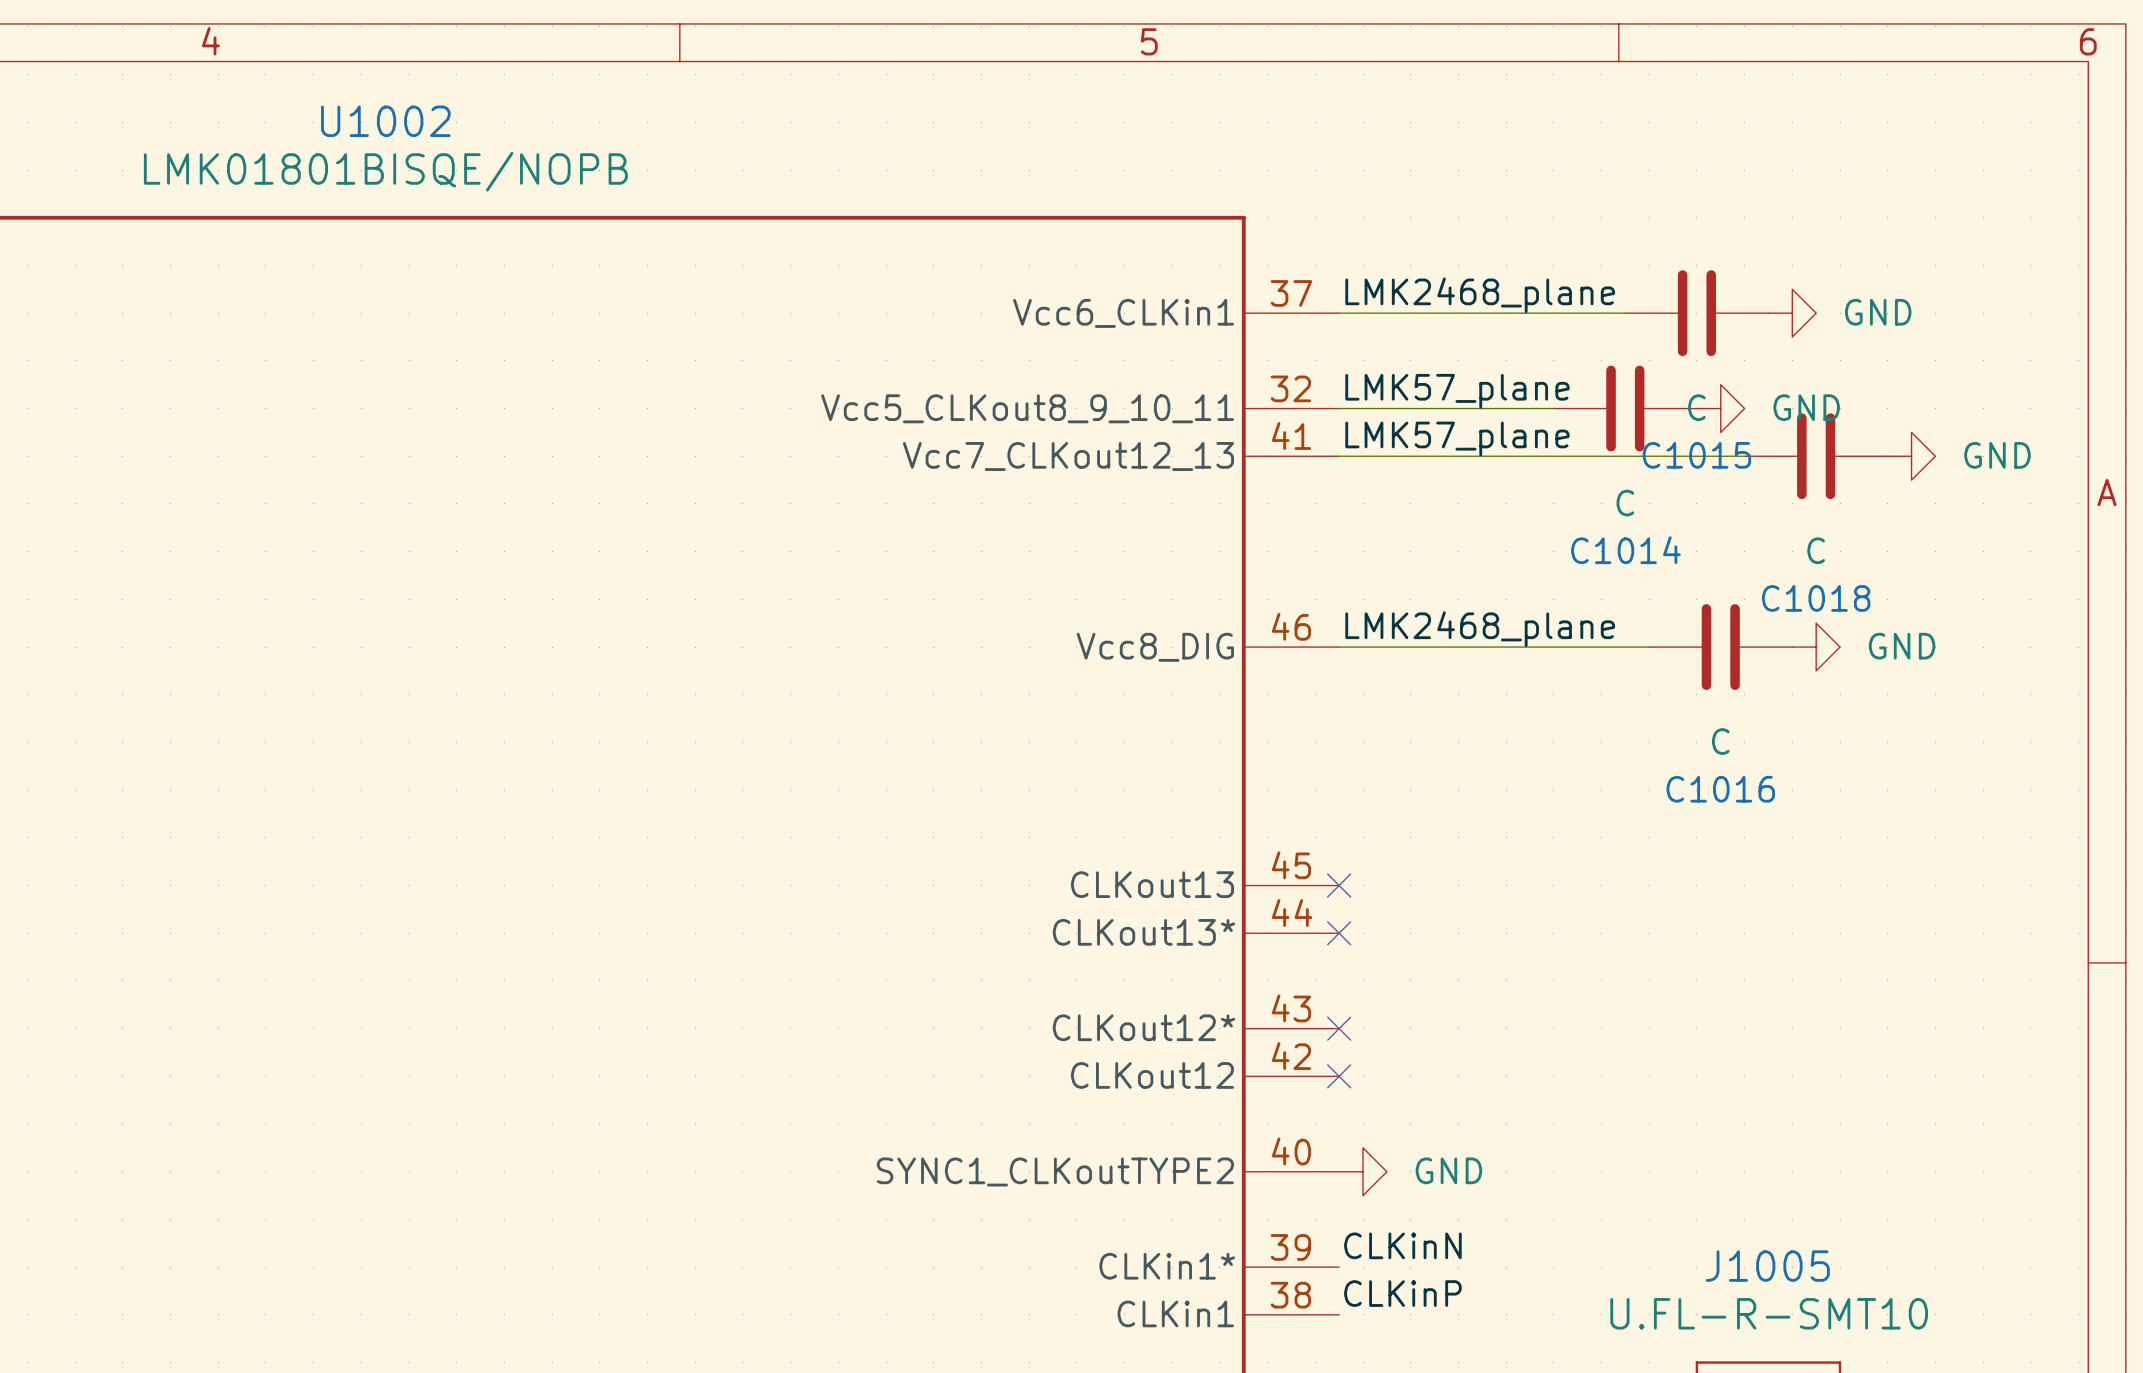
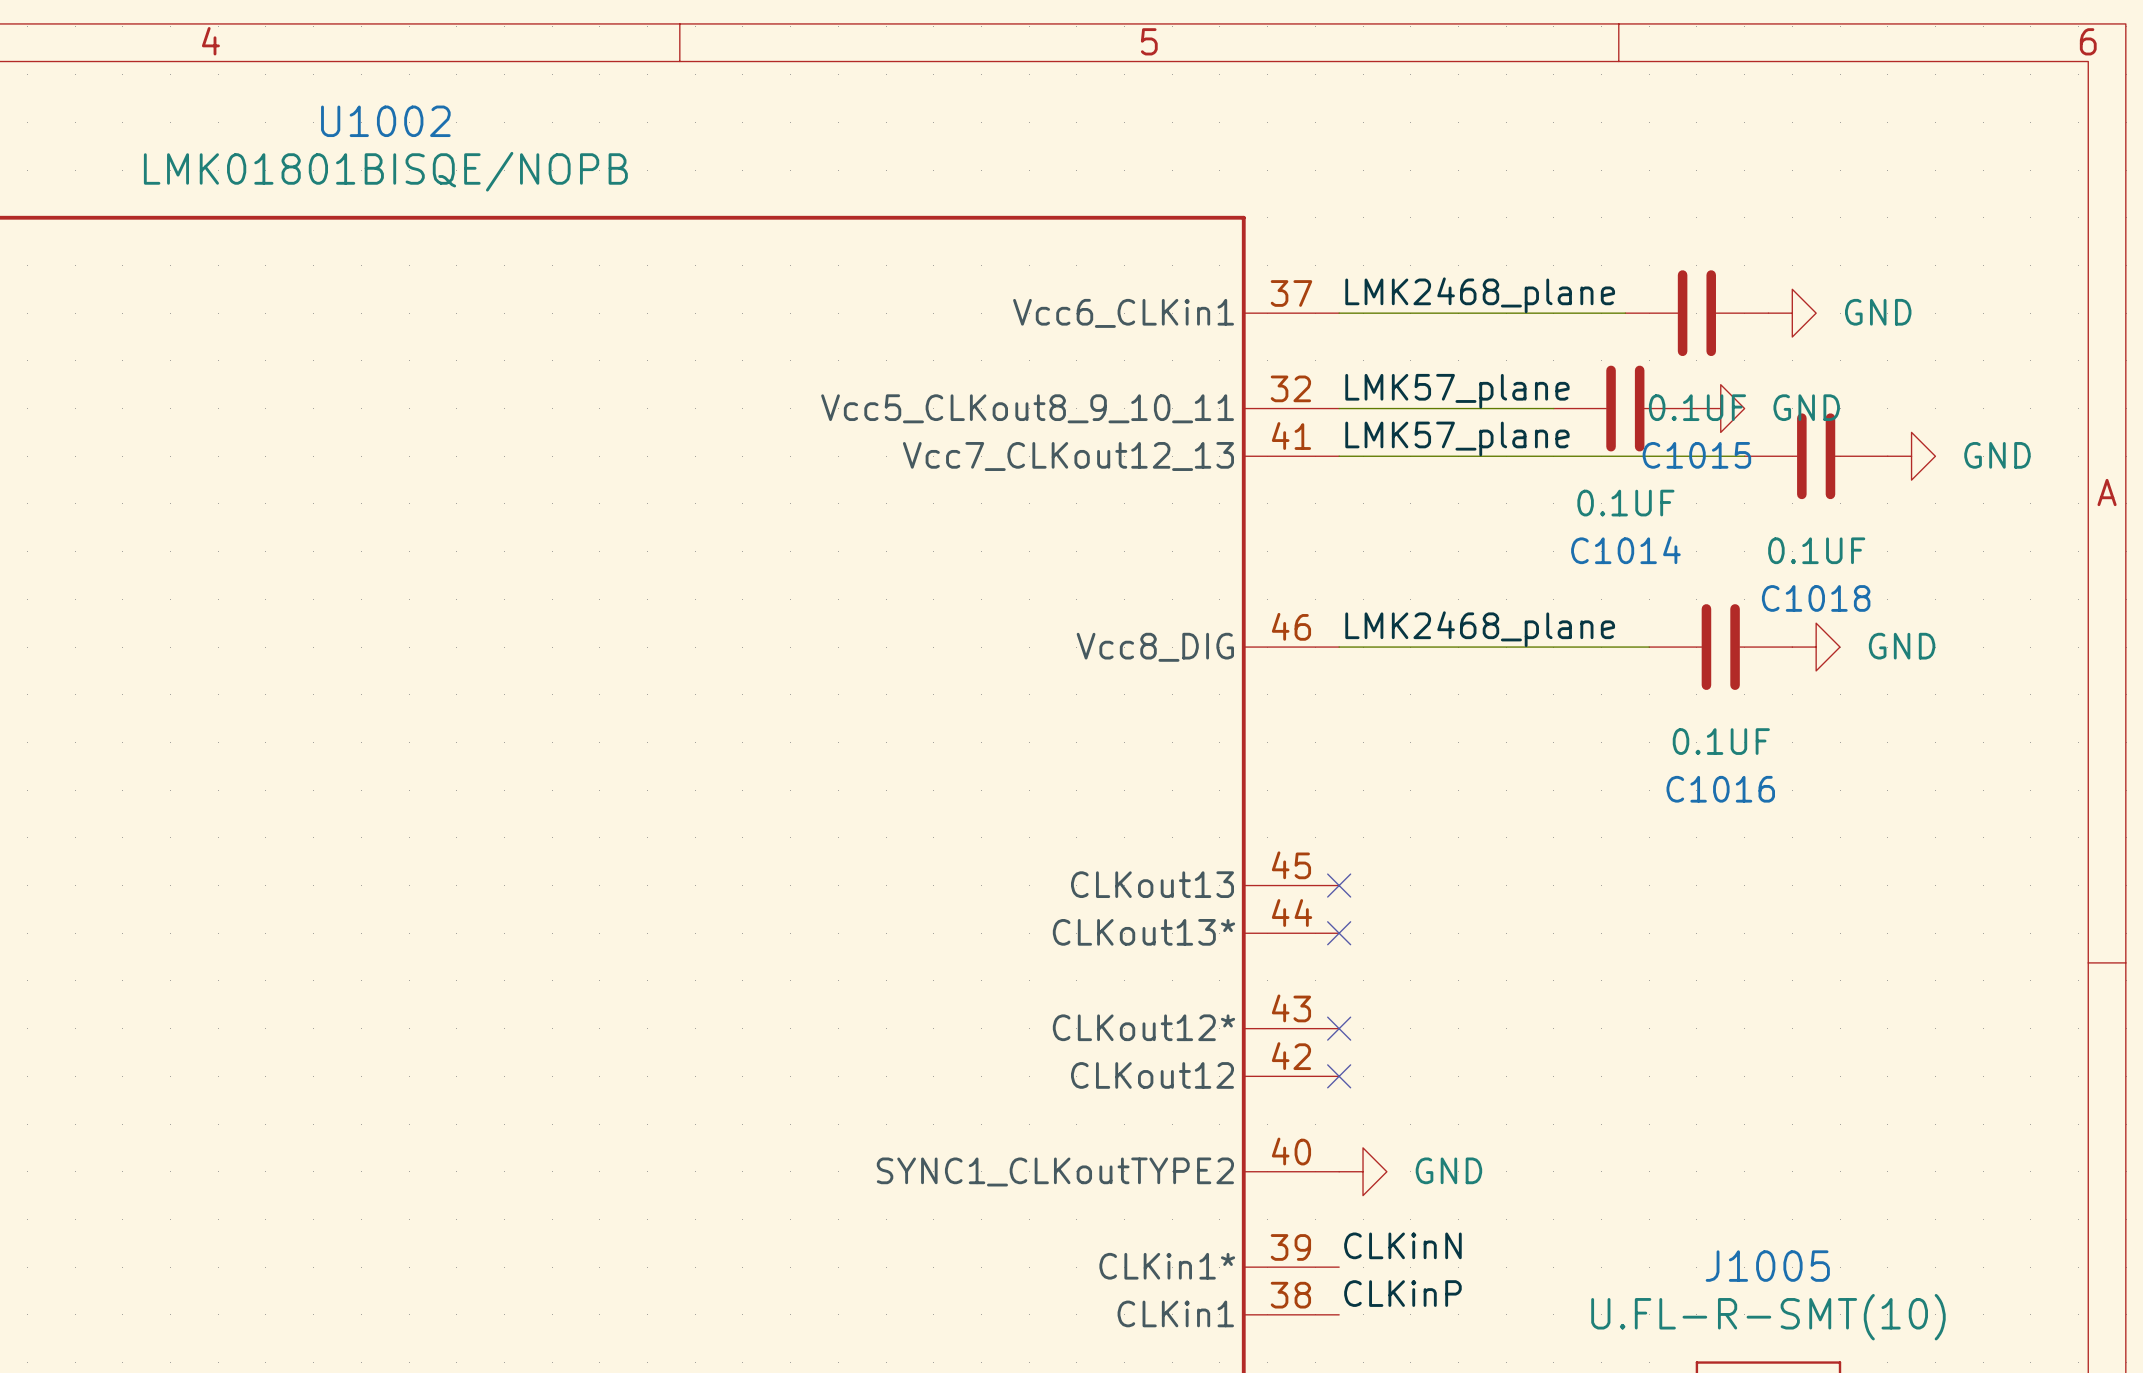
C1015 value: C (1696, 407) -> 0.1UF (1697, 407)
C1014 value: C (1625, 503) -> 0.1UF (1625, 503)
C1018 value: C (1816, 550) -> 0.1UF (1816, 550)
C1016 value: C (1720, 741) -> 0.1UF (1721, 741)
J1005 value: U.FL-R-SMT10 (1769, 1313) -> U.FL-R-SMT(10) (1768, 1317)

